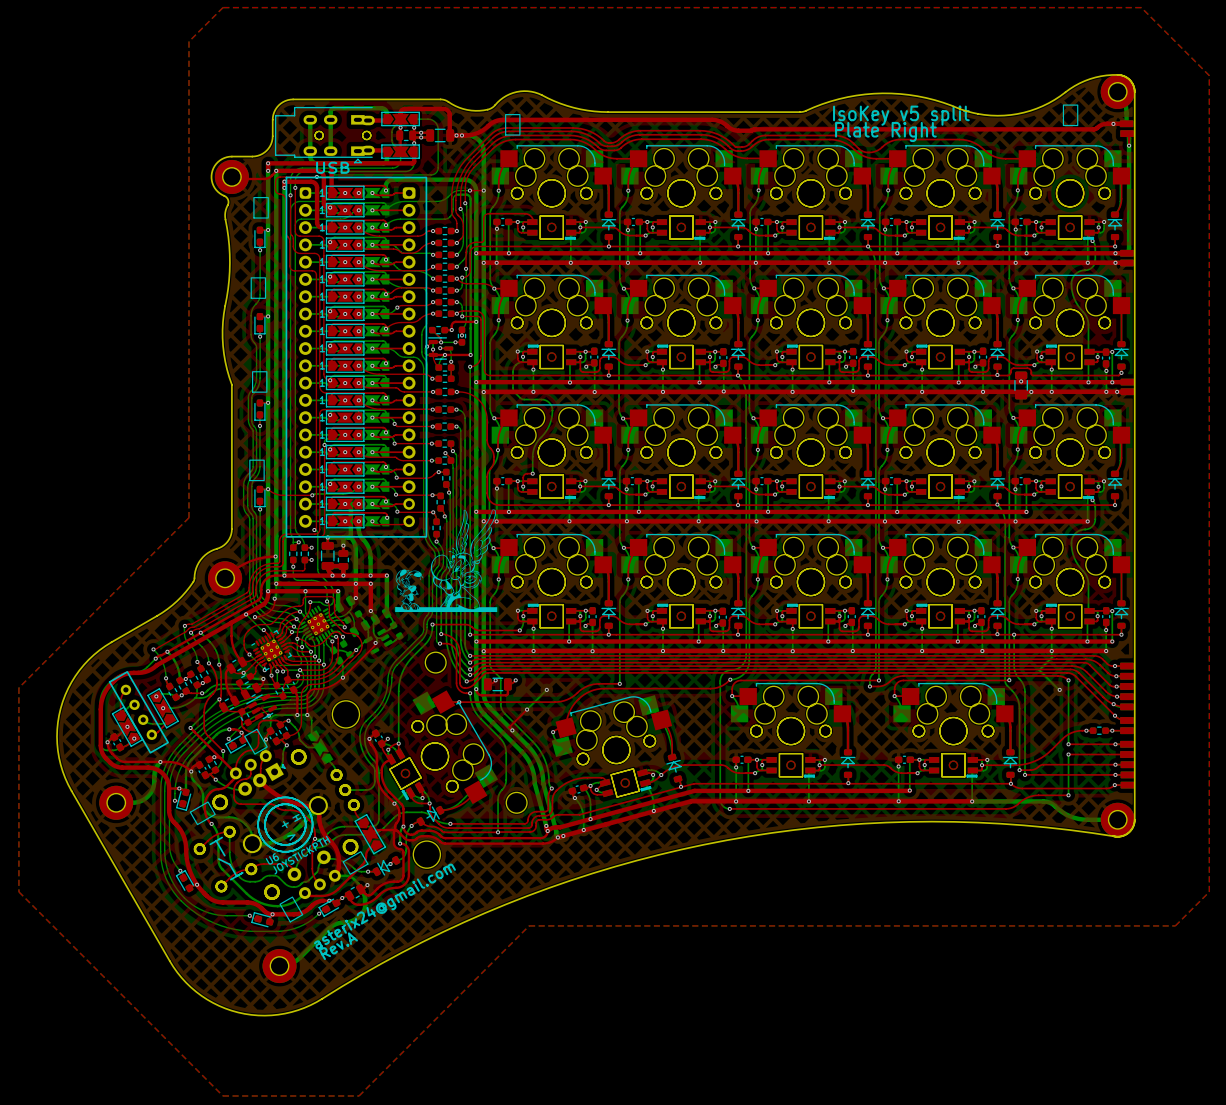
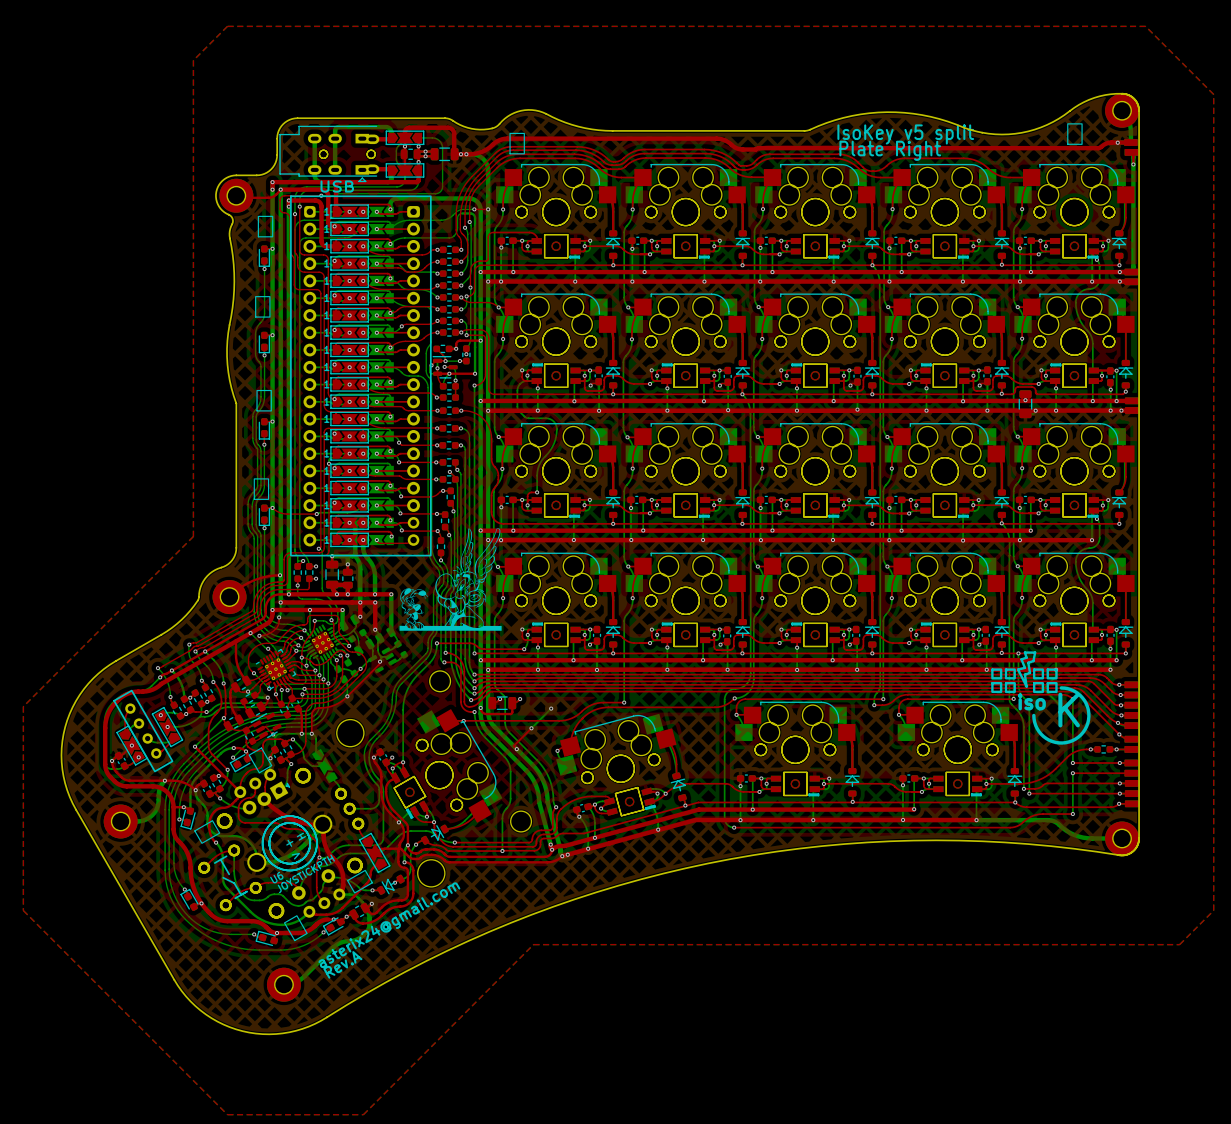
drawing: none -> [991, 651, 1091, 745]

